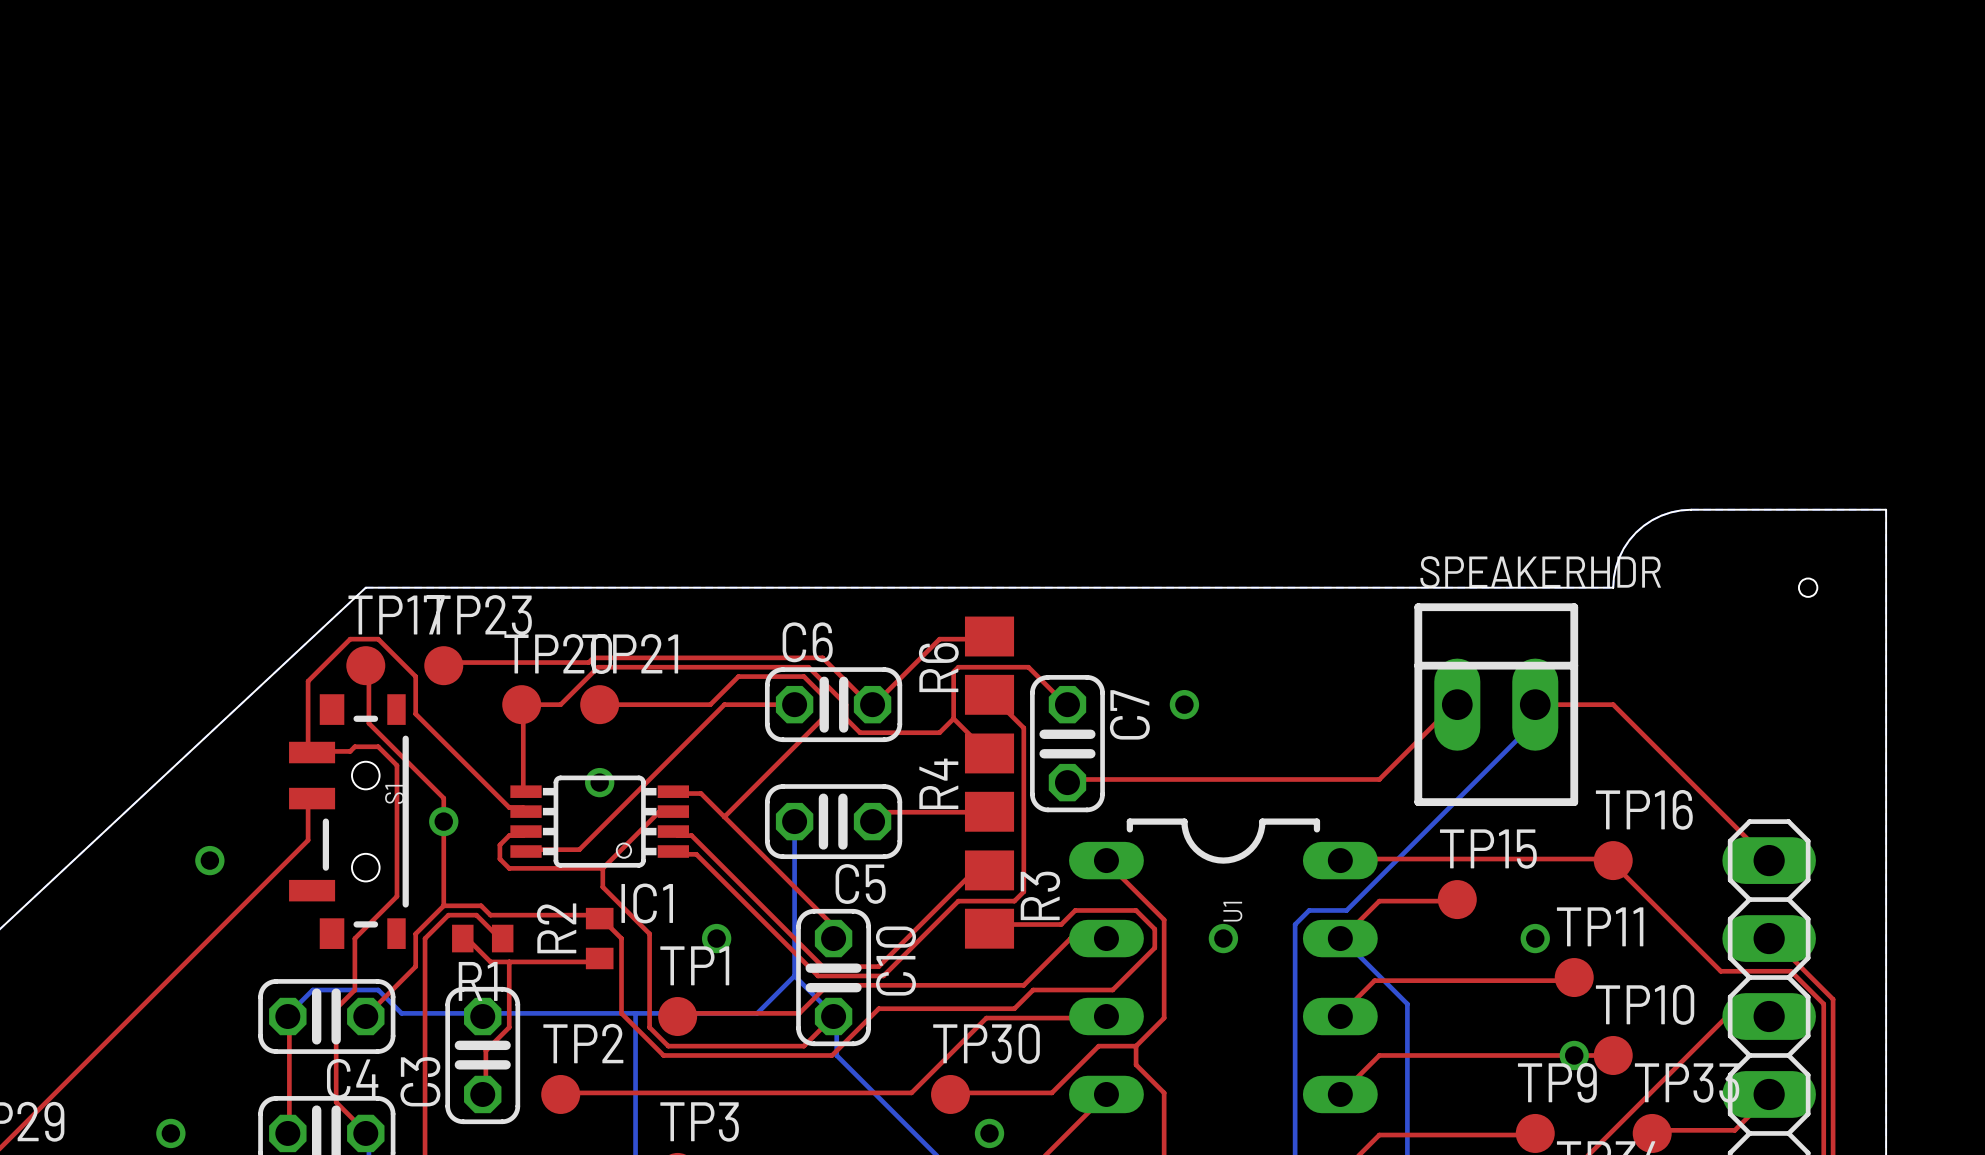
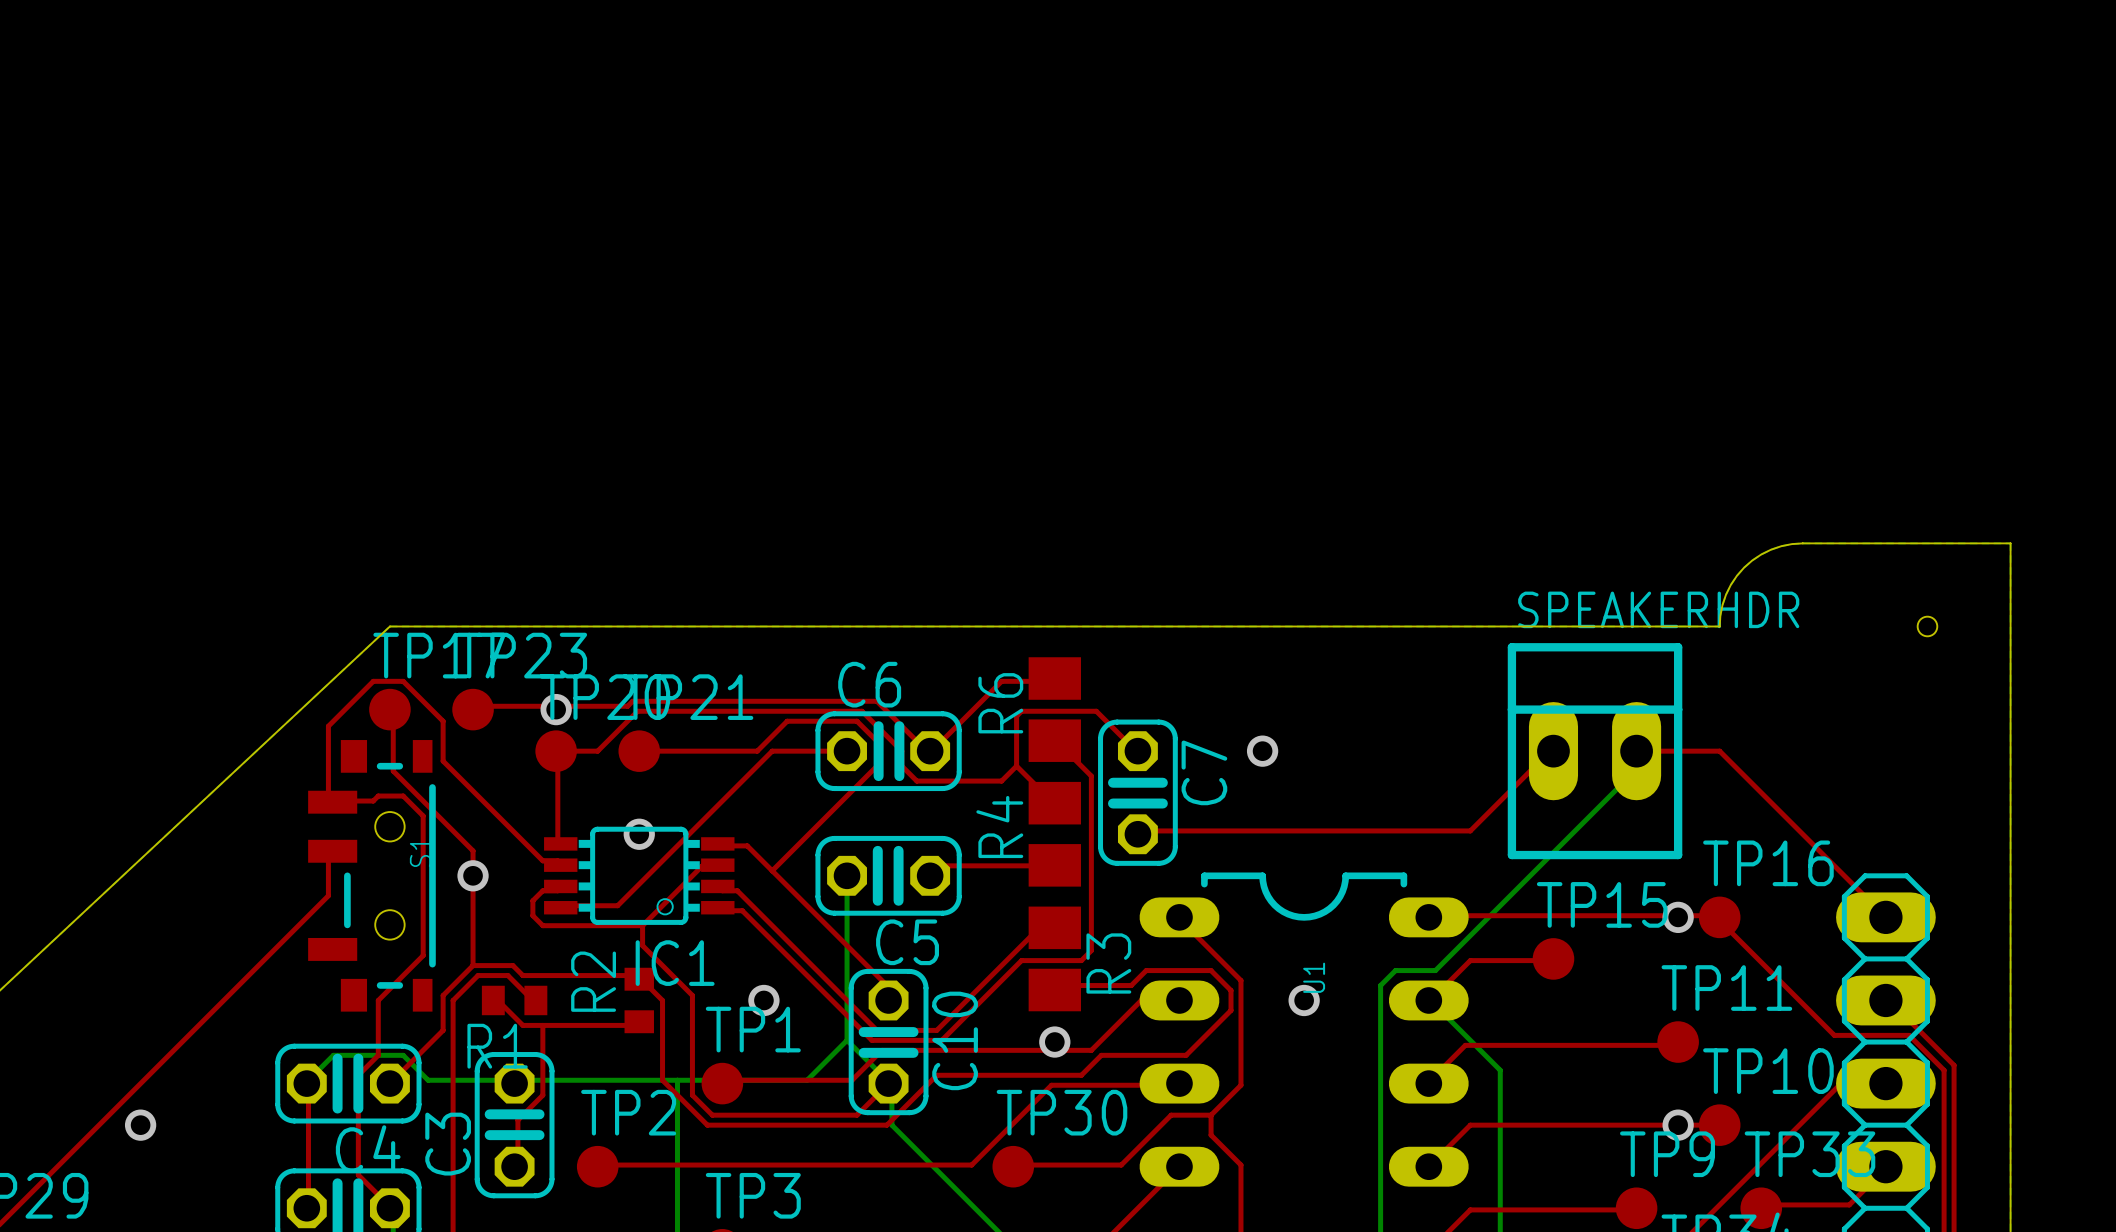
via: none -> (556, 709)
via: (209, 860) -> none
via position: (1535, 938) -> (1678, 917)
via position: (170, 1133) -> (140, 1125)
via position: (989, 1133) -> (1054, 1042)

